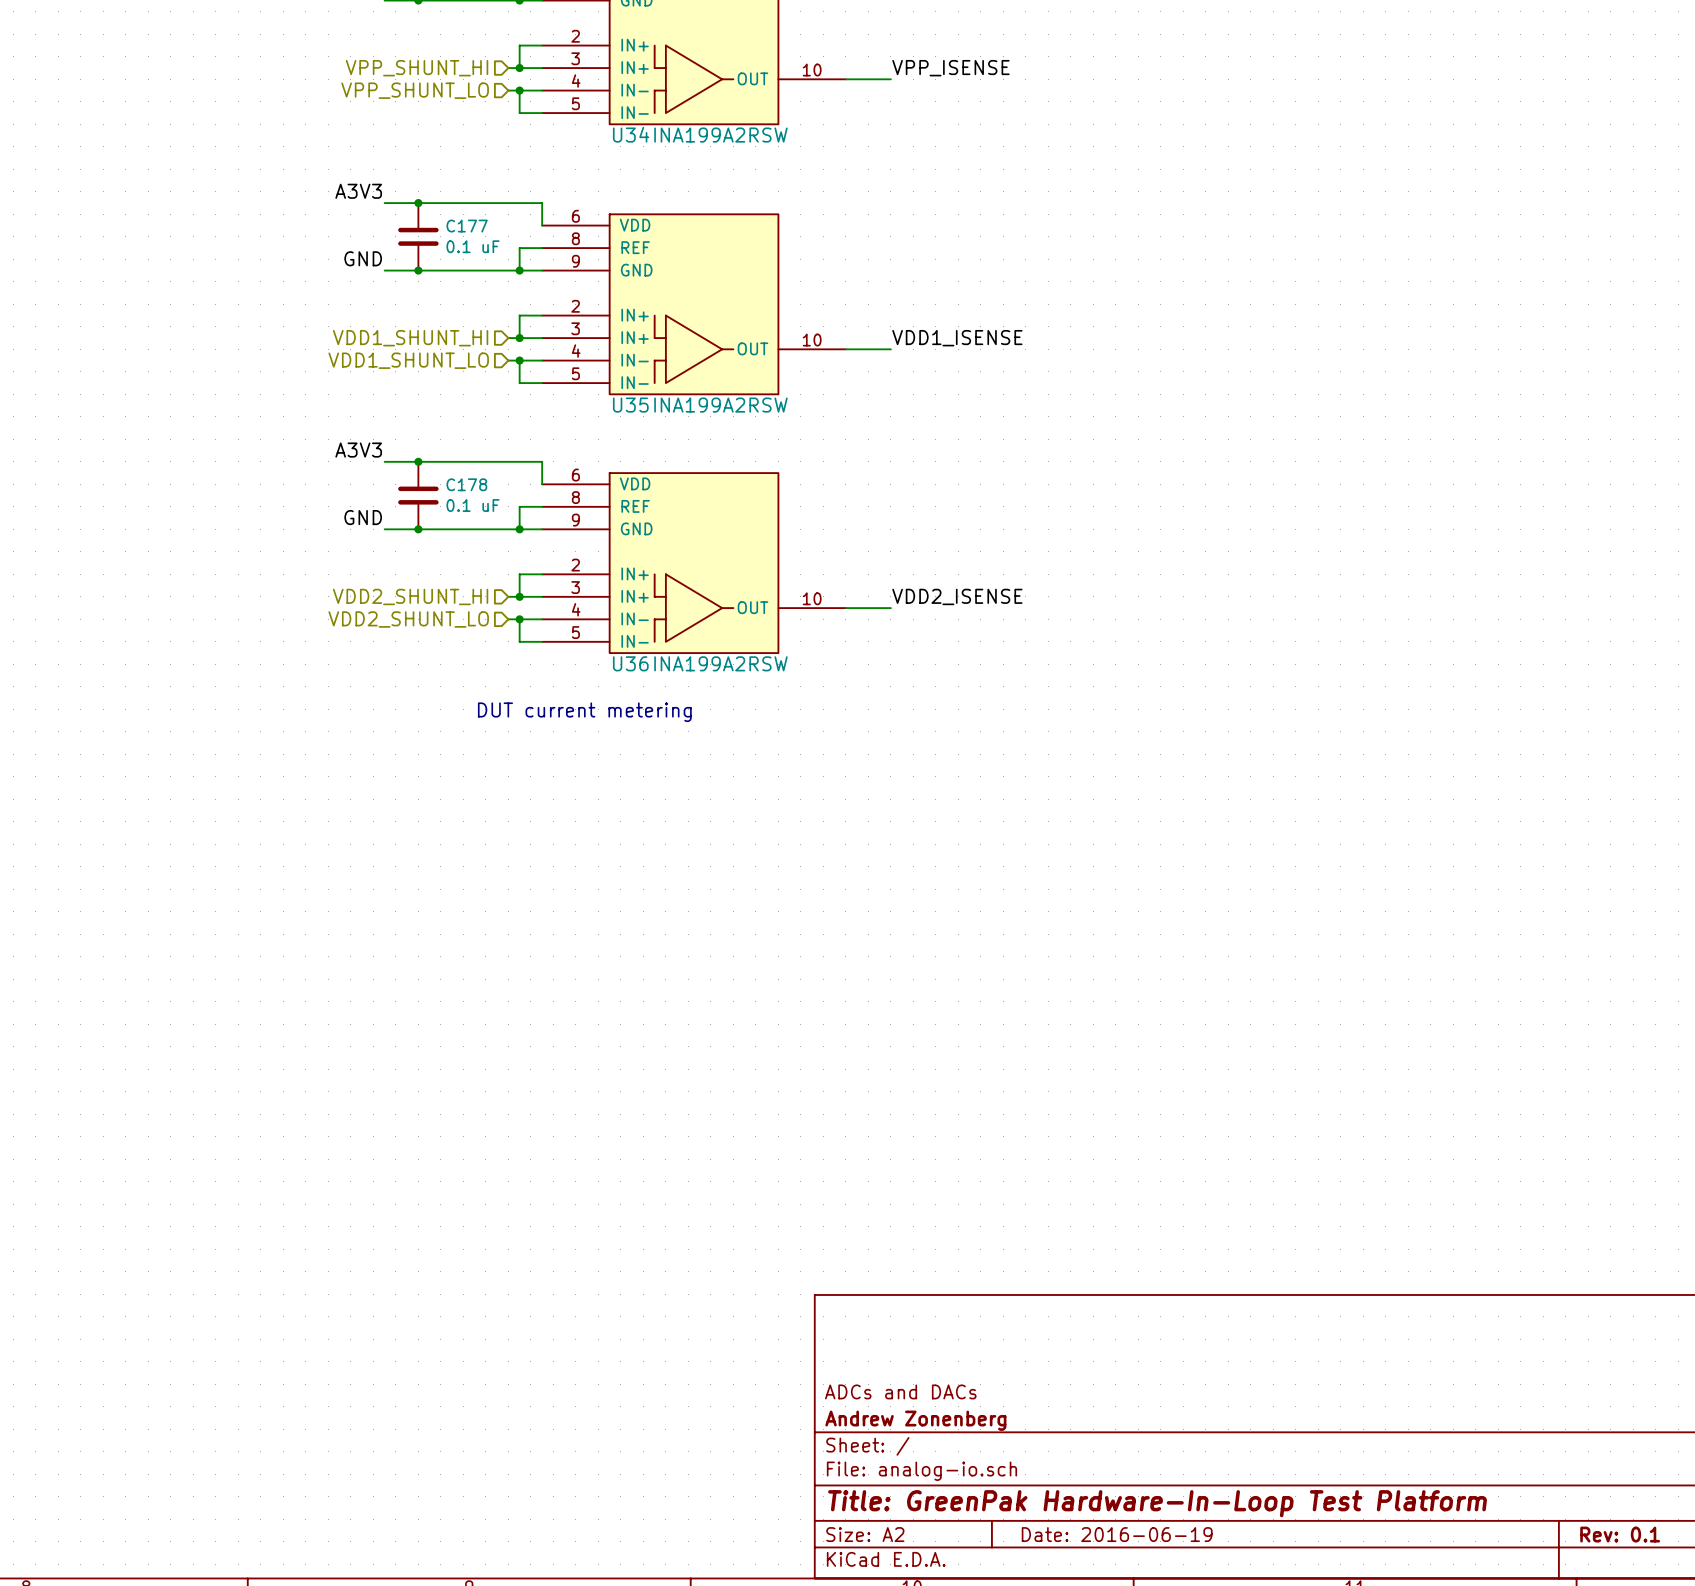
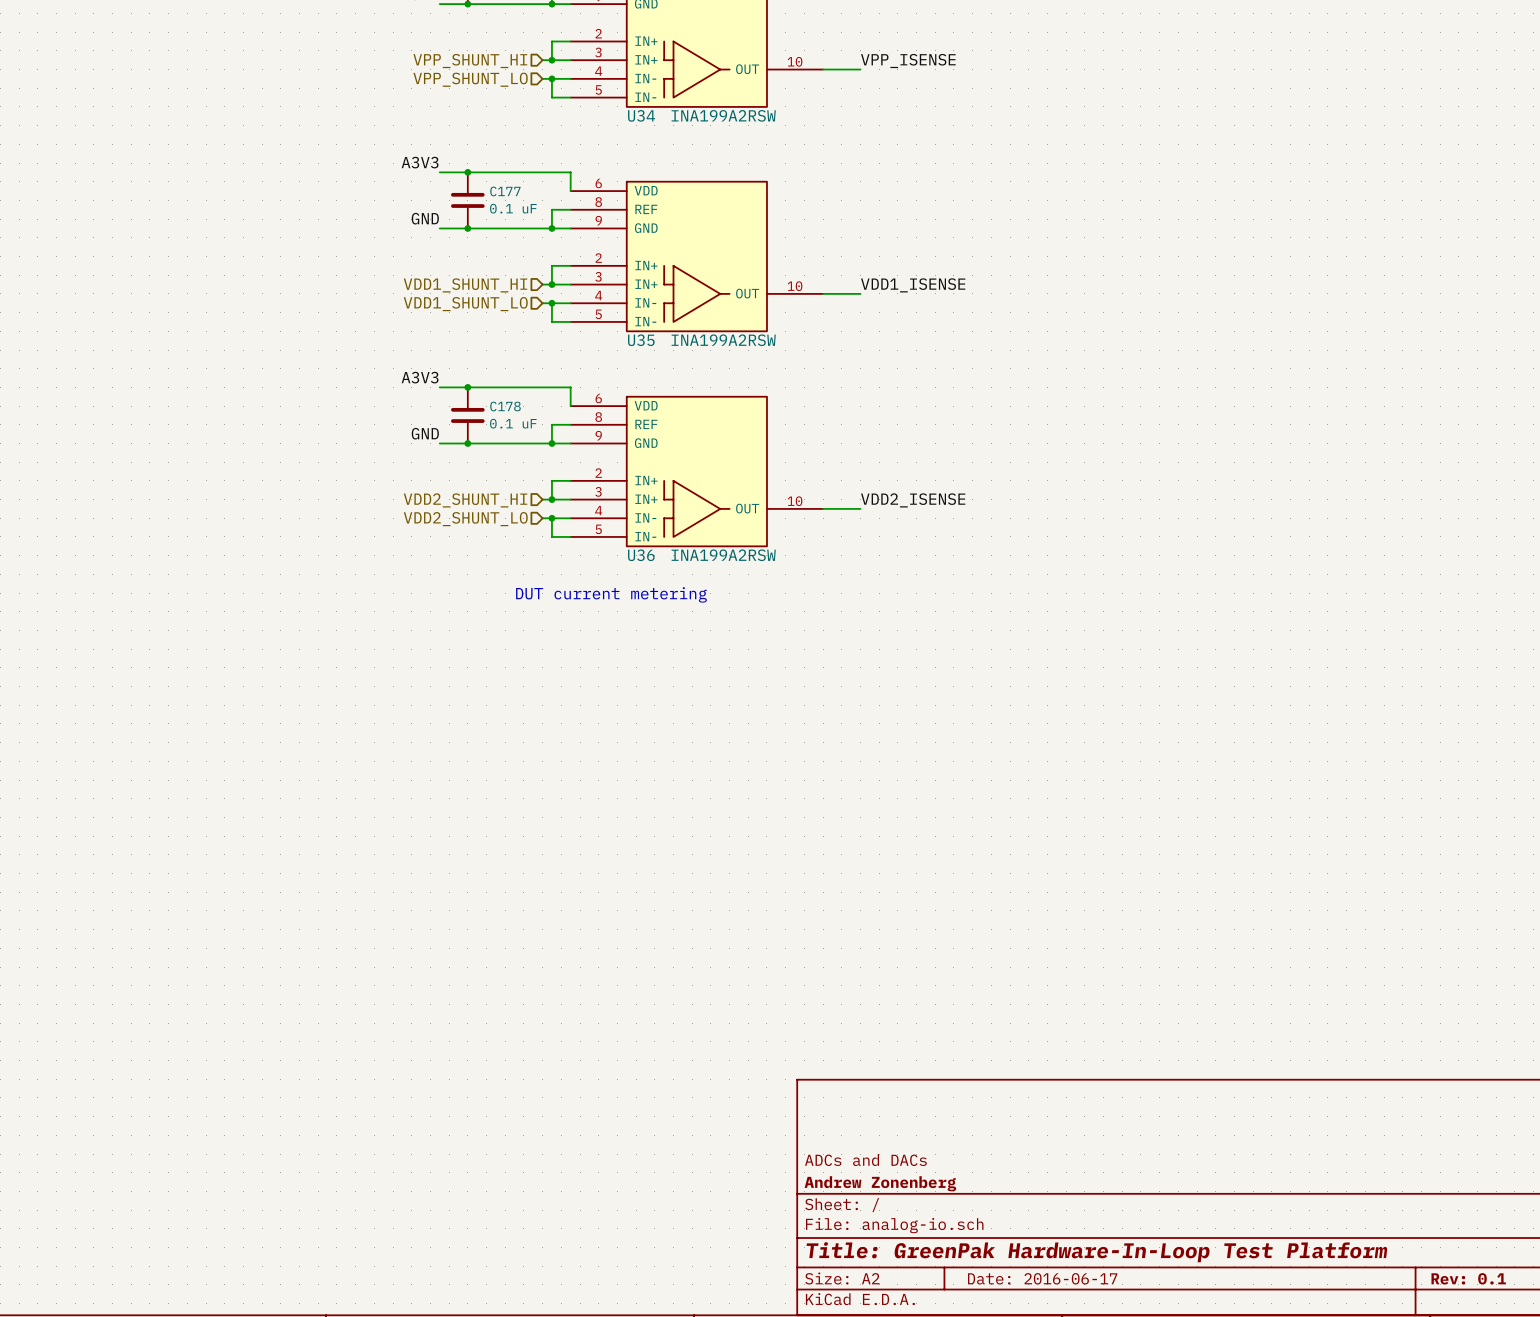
title block: Date: 2016-06-19 (1117, 1534) -> Date: 2016-06-17 (1042, 1278)

